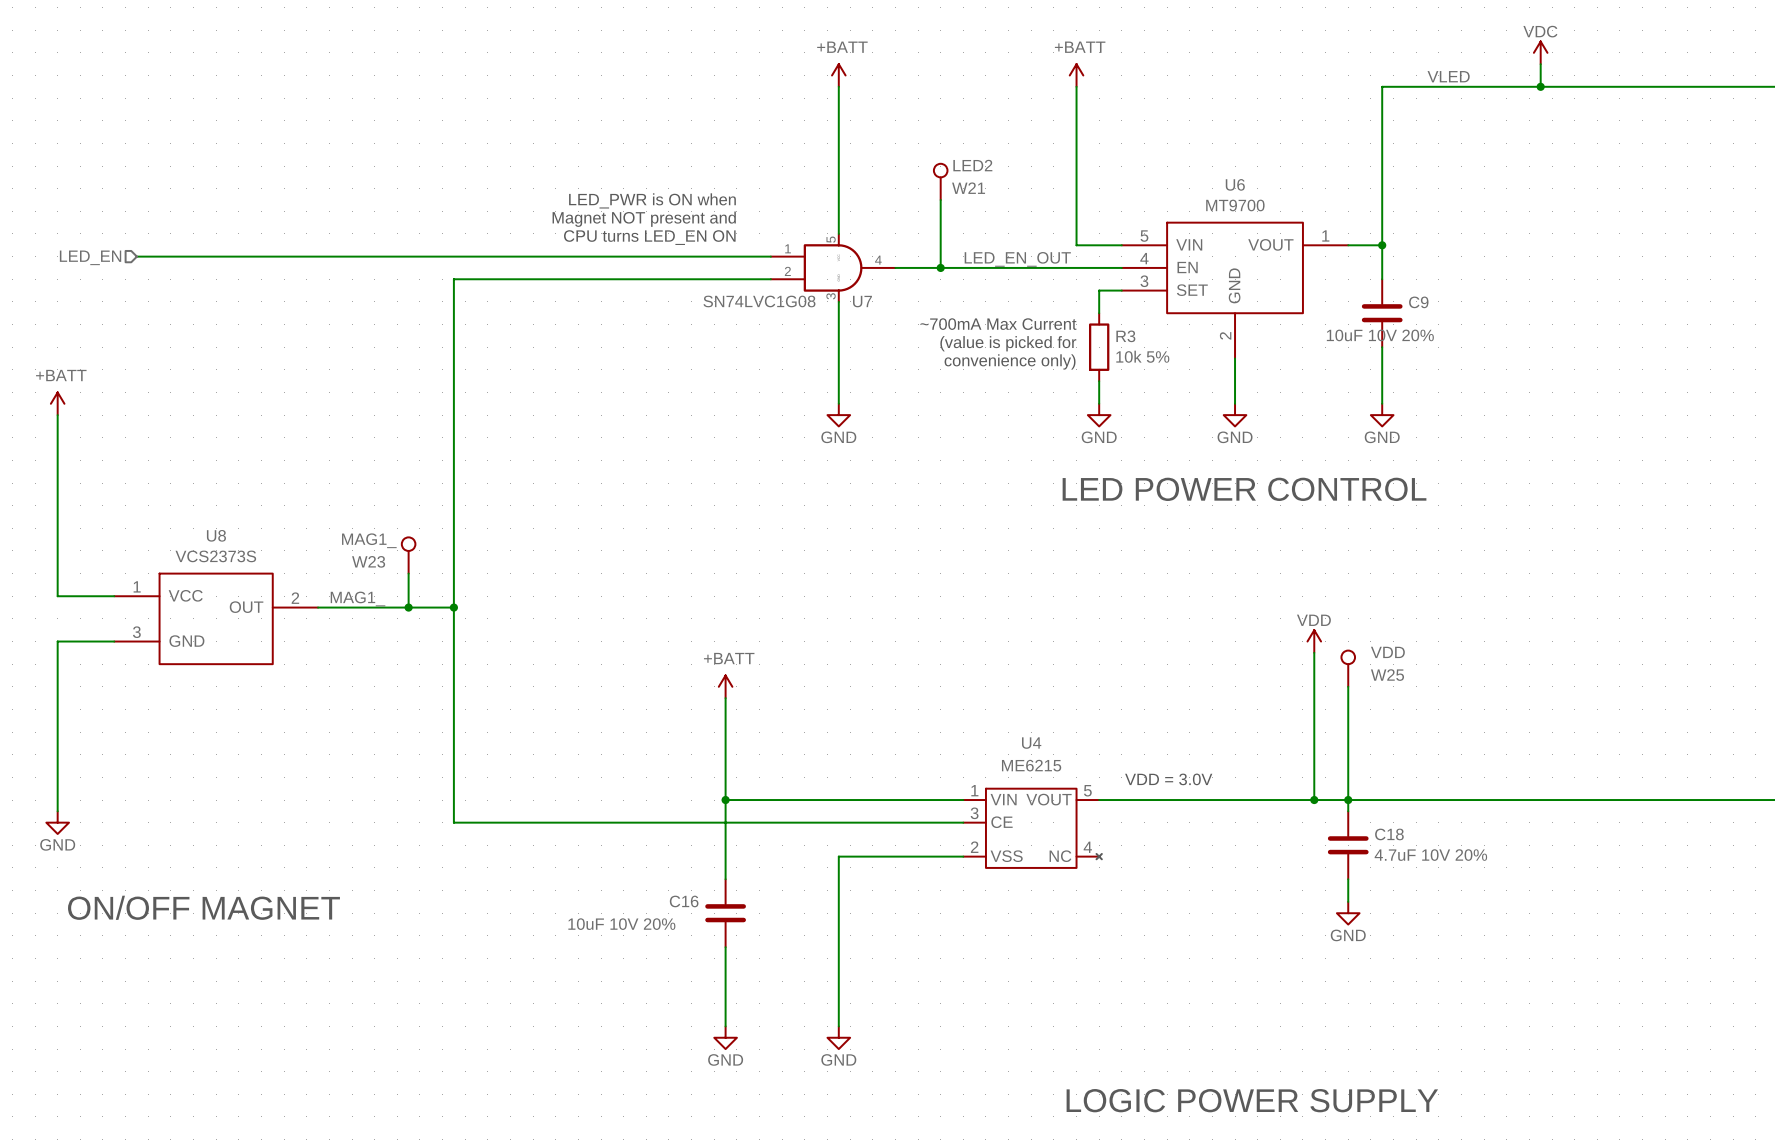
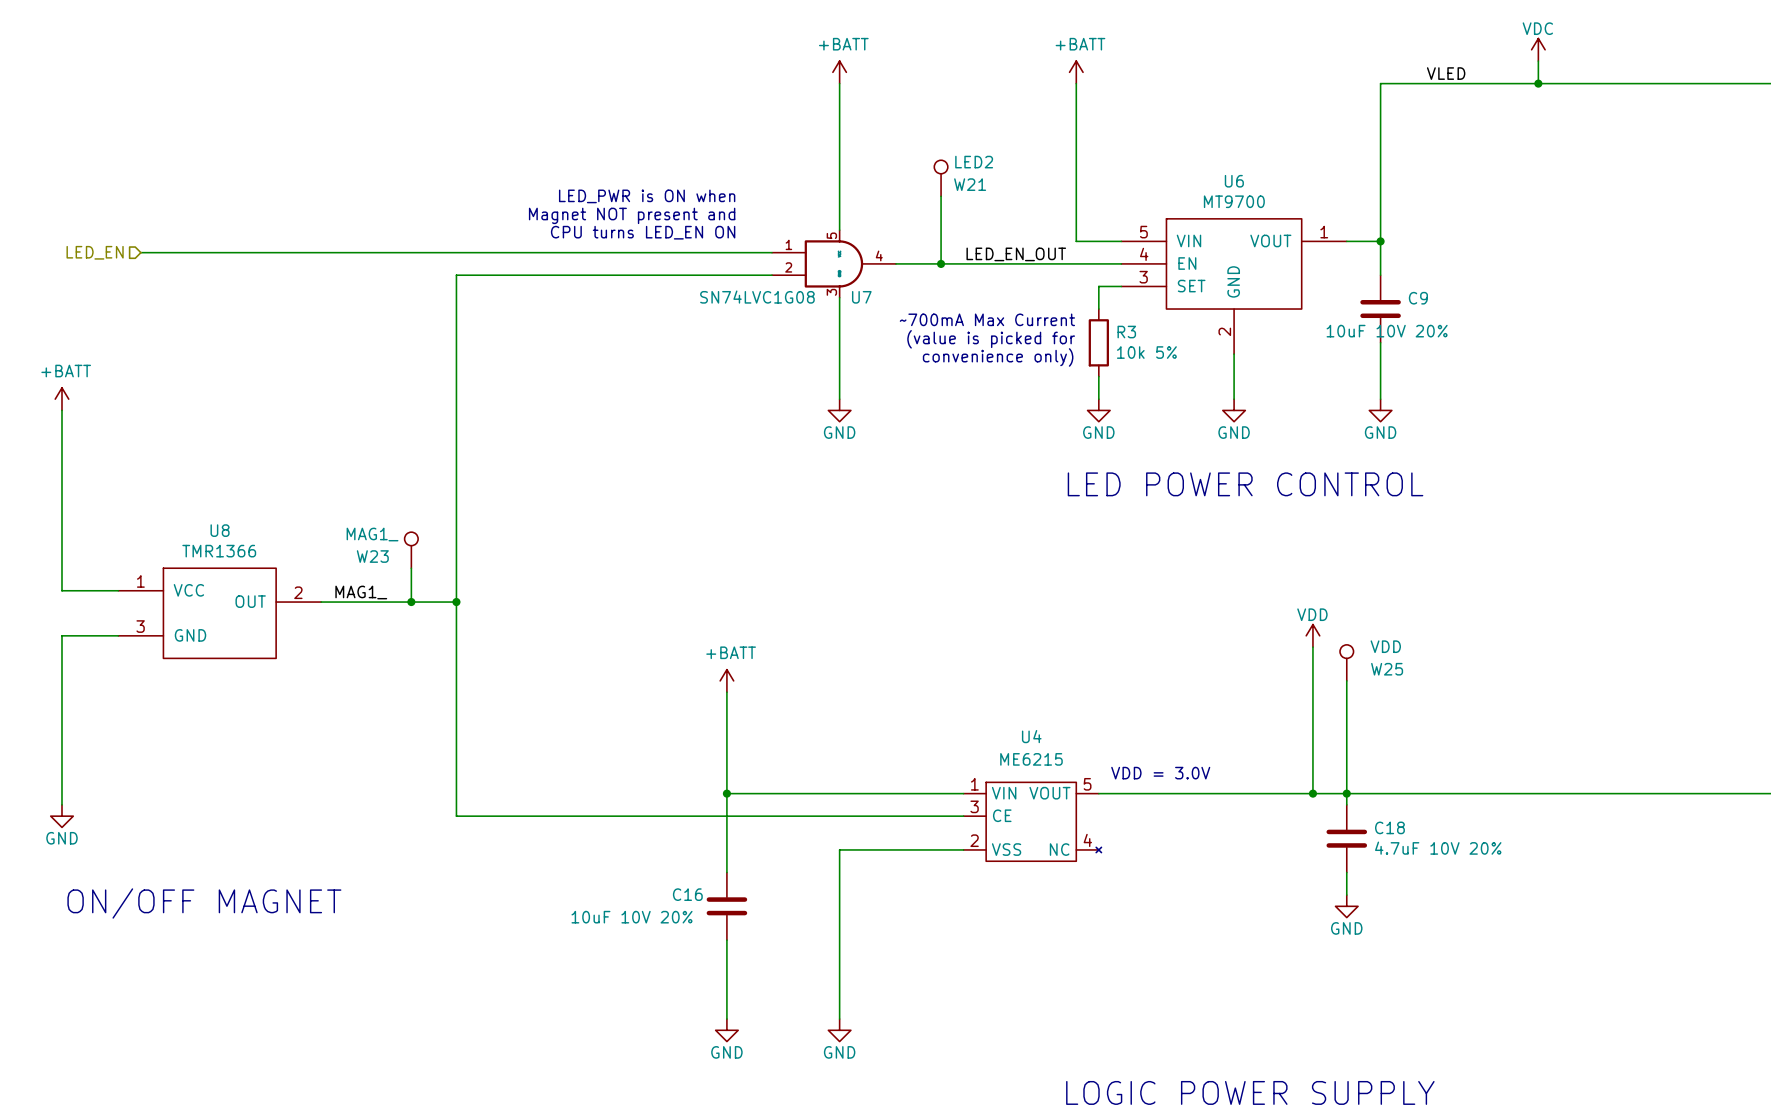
U8 value: VCS2373S (215, 556) -> TMR1366 (219, 551)

